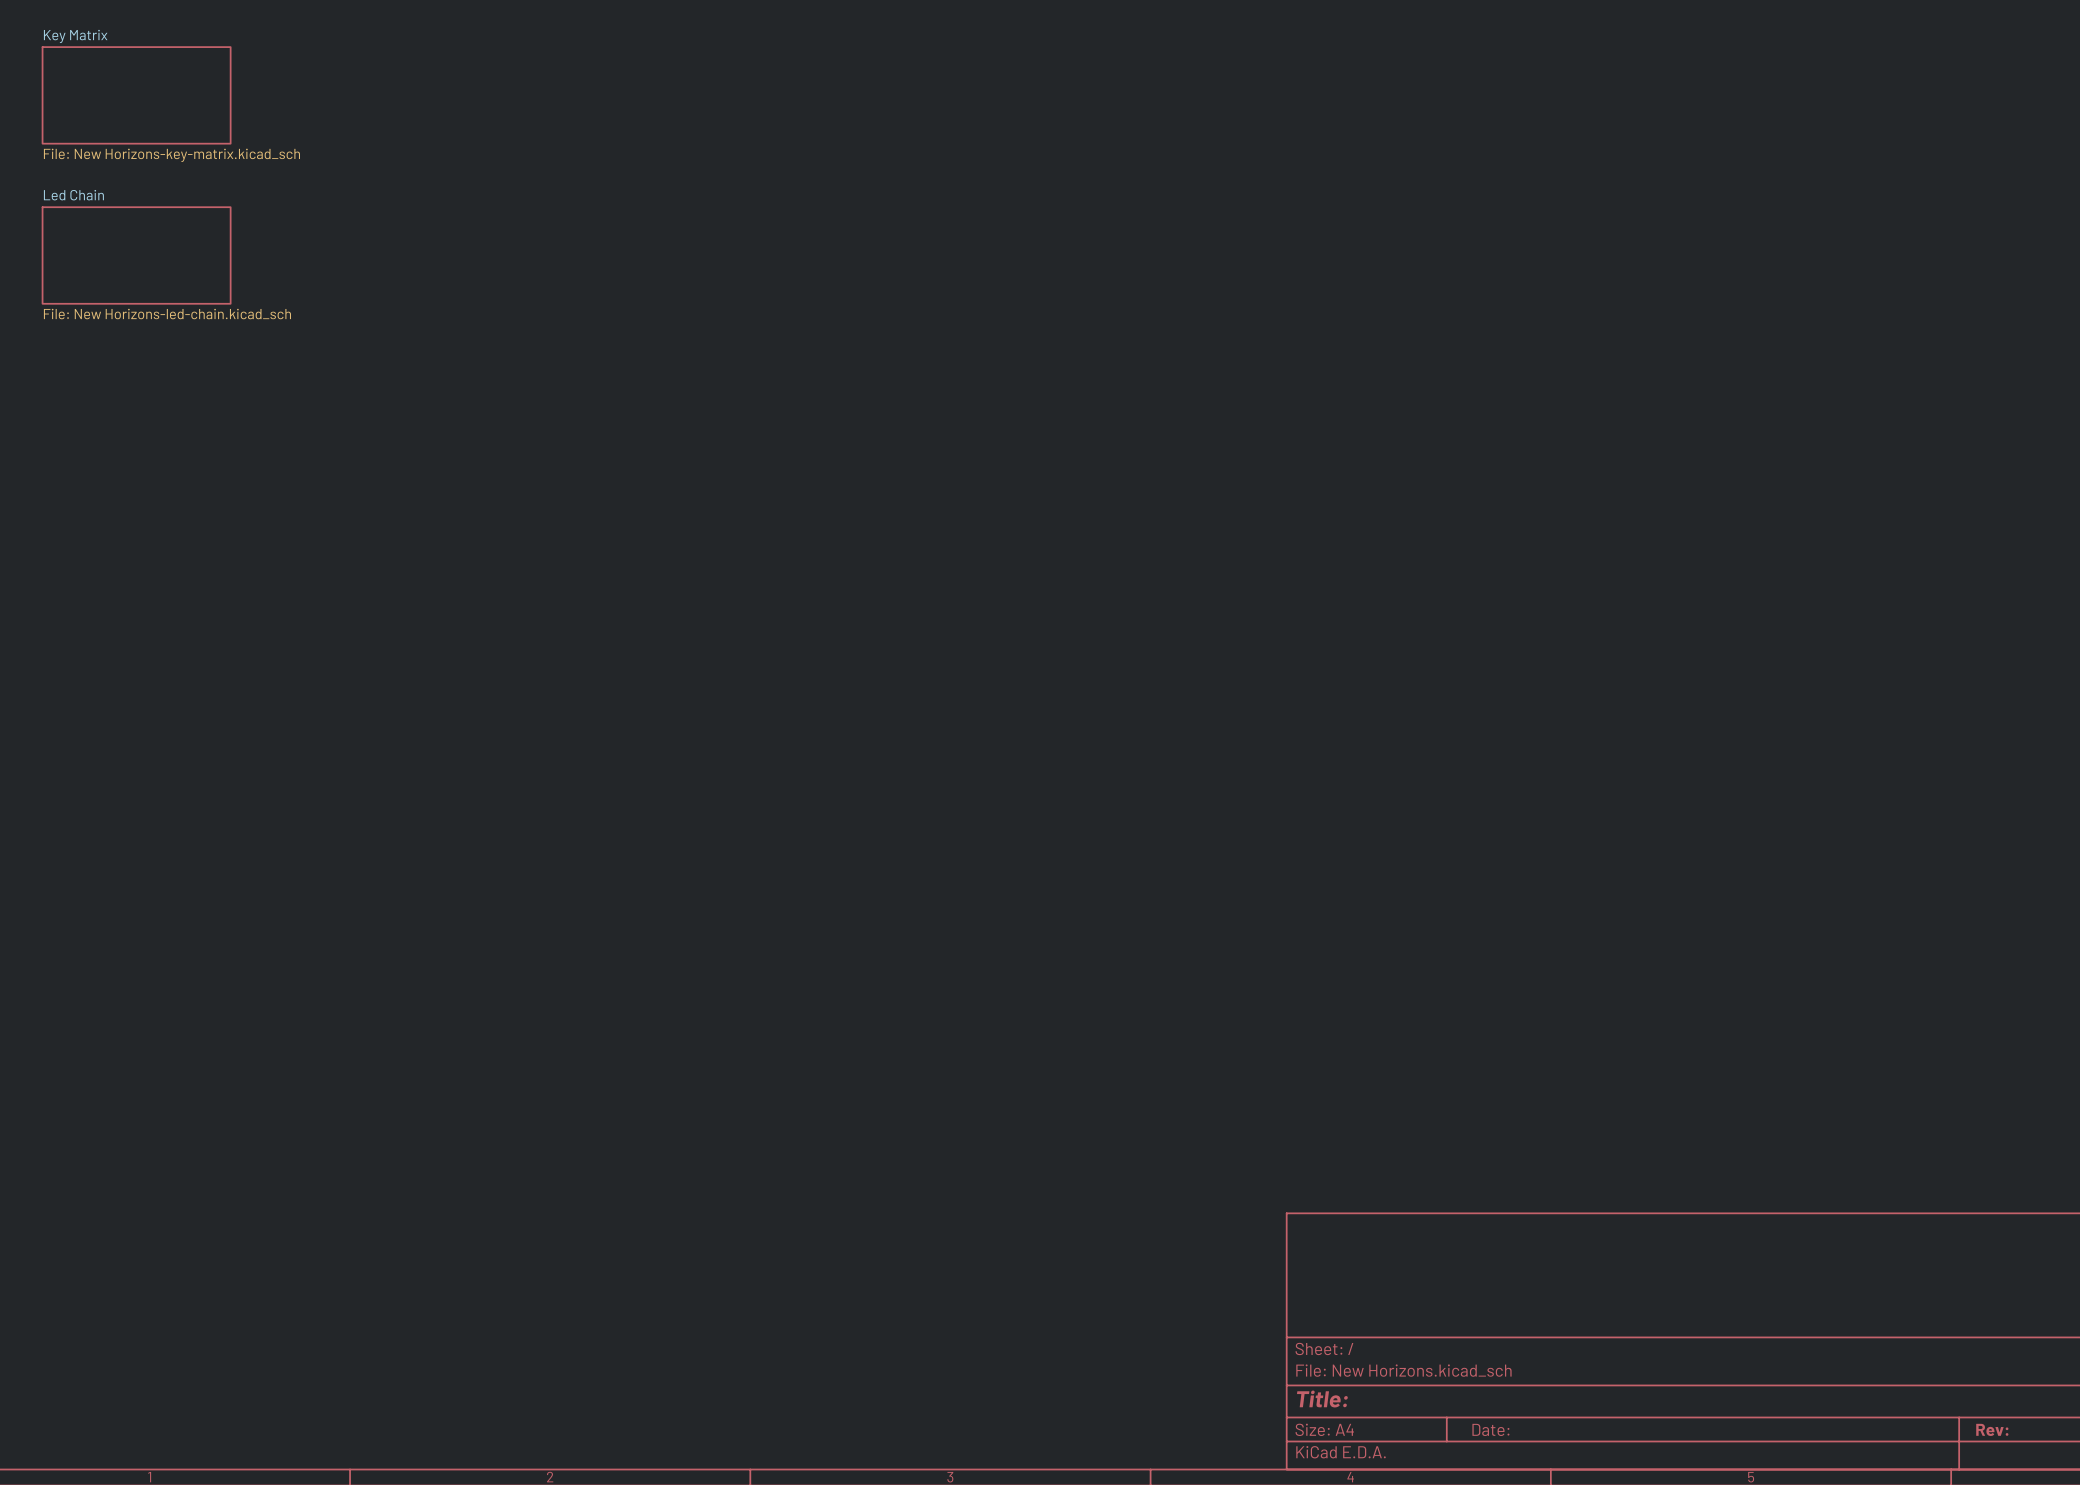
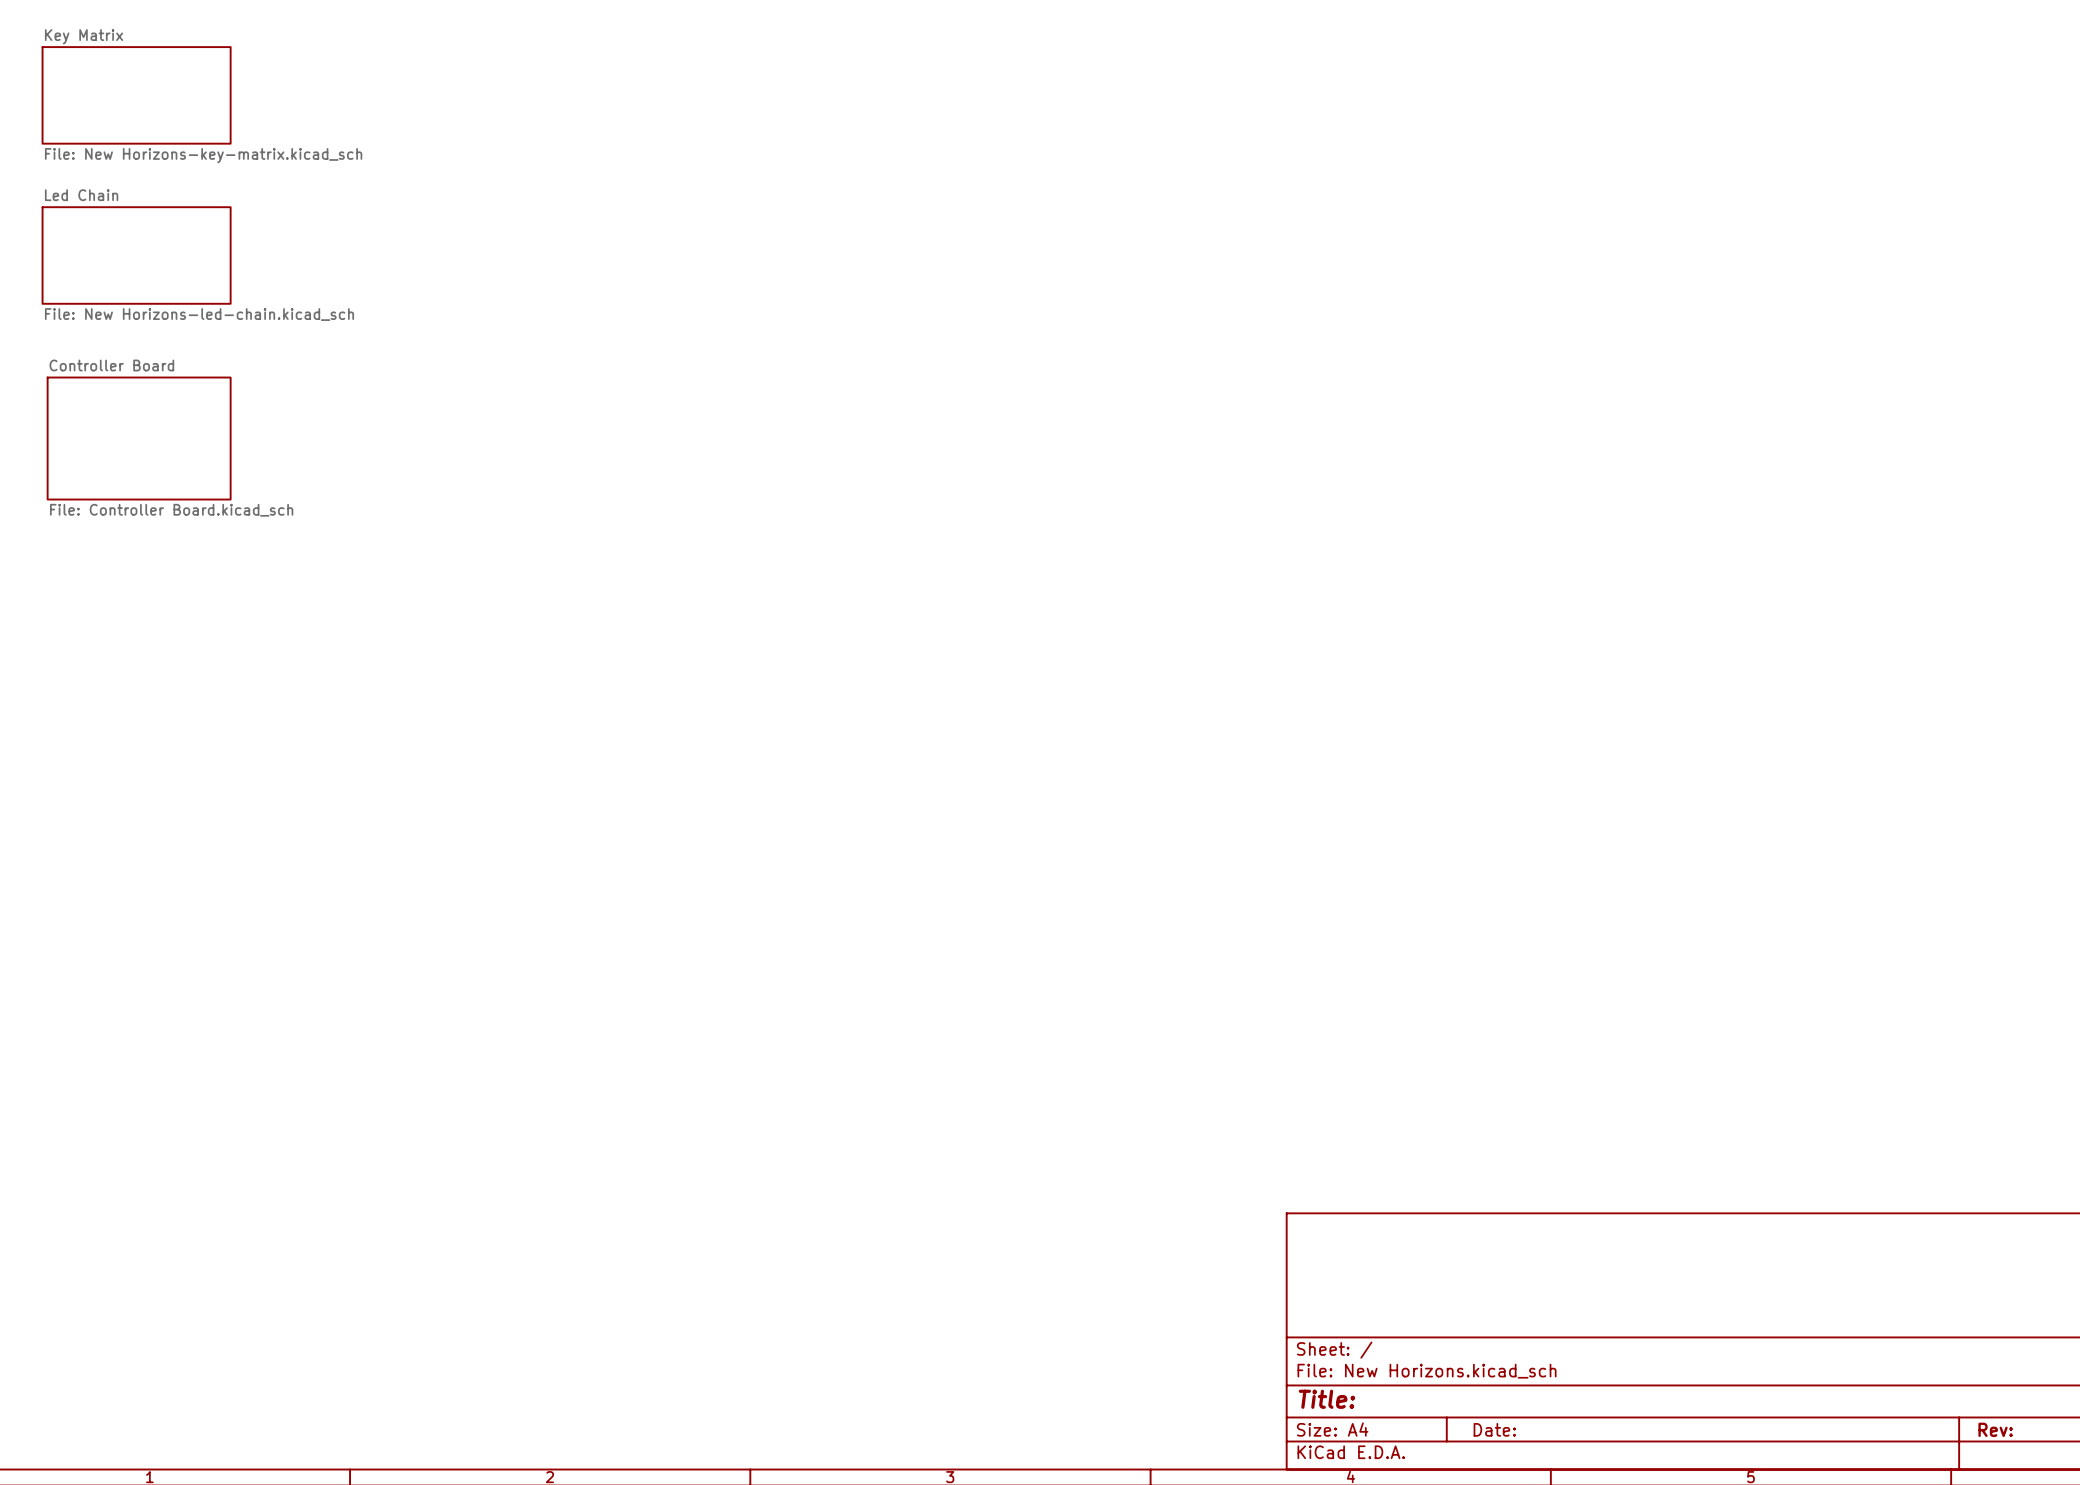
sheet Controller Board: none -> File: Controller Board.kicad_sch (139, 438)

